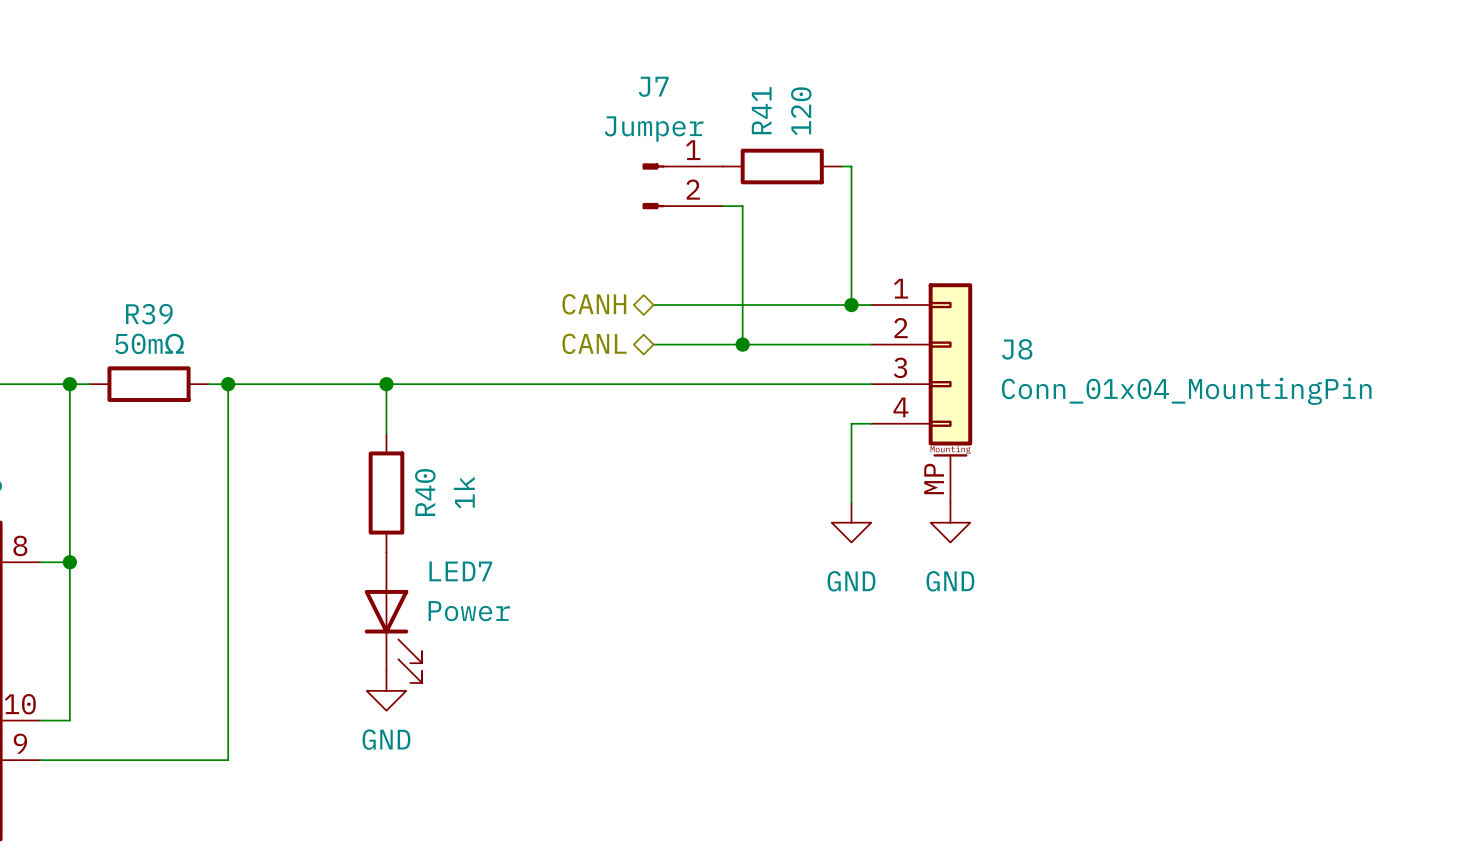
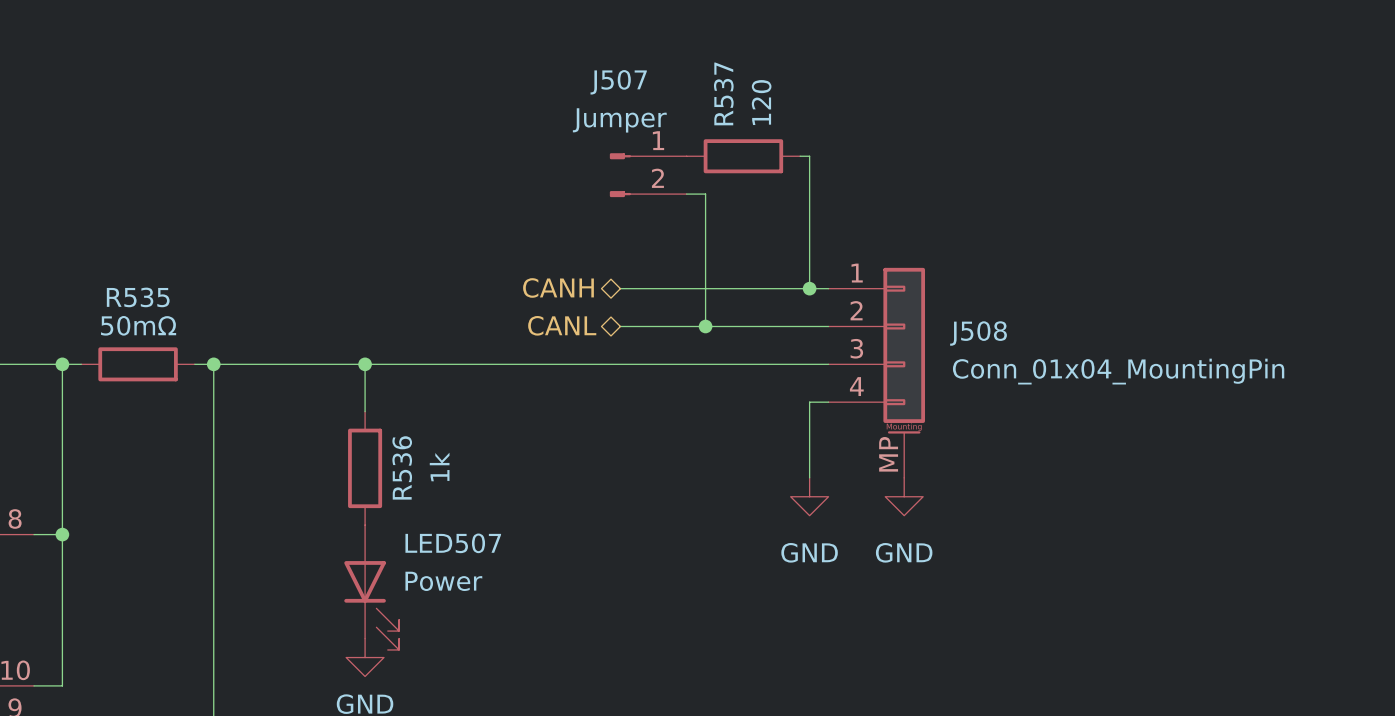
J7 name: J7 (653, 86) -> J507 (618, 82)
R41 name: R41 (761, 110) -> R537 (723, 93)
R39 name: R39 (149, 314) -> R535 (138, 297)
J8 name: J8 (1017, 349) -> J508 (978, 333)
R40 name: R40 (425, 492) -> R536 (402, 467)
LED7 name: LED7 (460, 571) -> LED507 (453, 543)

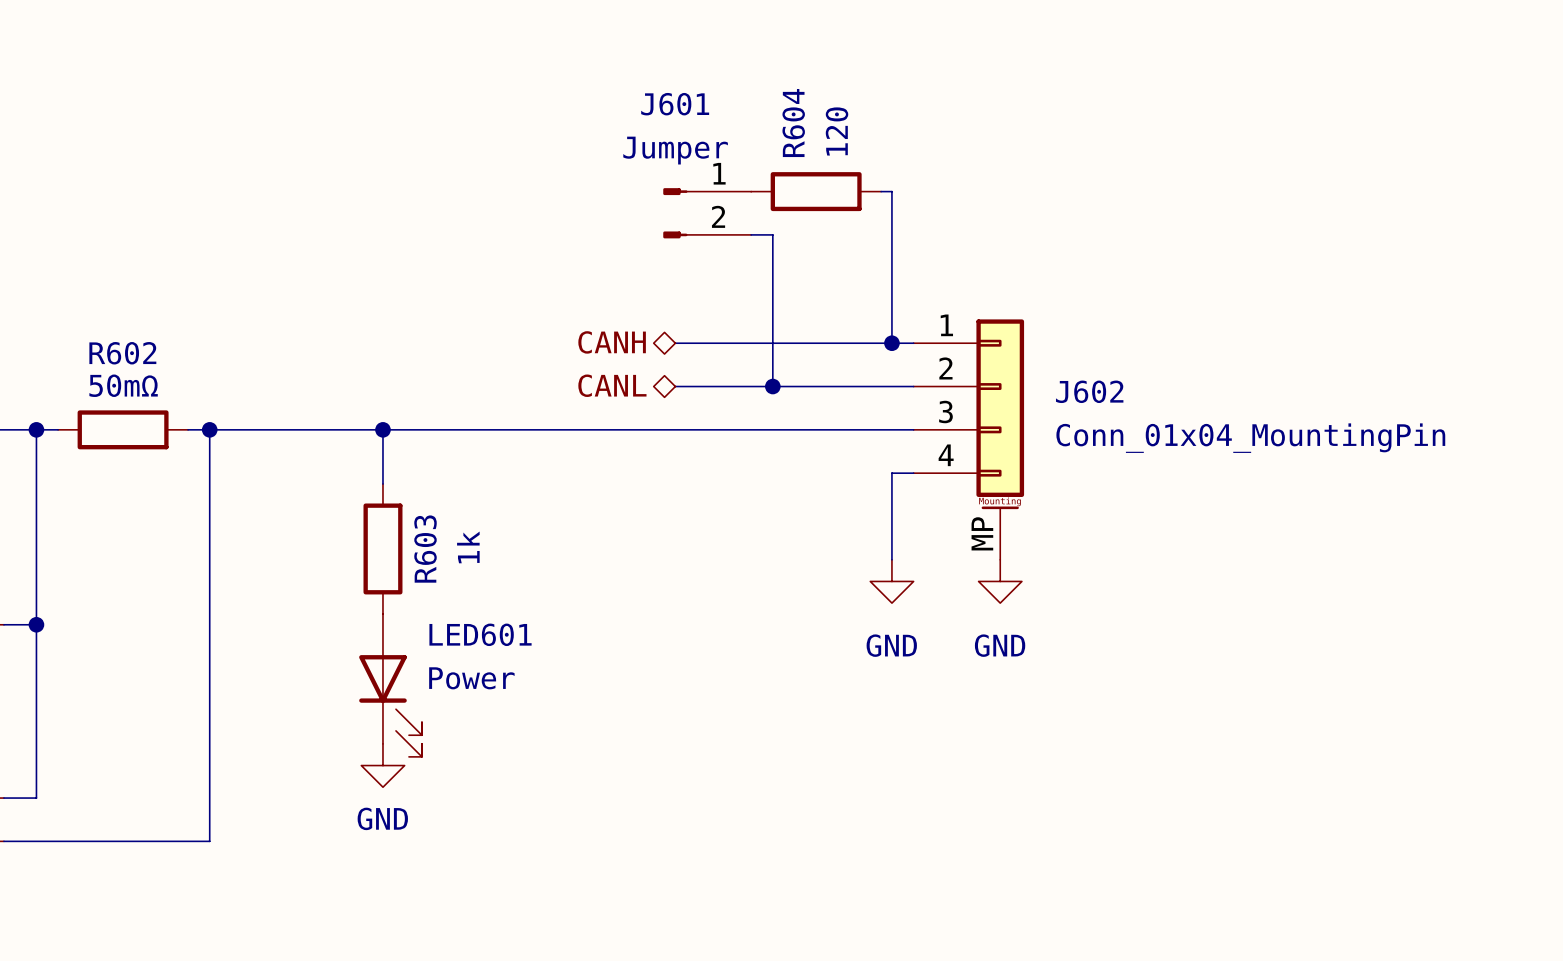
J507 name: J507 (618, 82) -> J601 (675, 104)
R537 name: R537 (723, 93) -> R604 (793, 123)
R535 name: R535 (138, 297) -> R602 (122, 353)
J508 name: J508 (978, 333) -> J602 (1089, 391)
R536 name: R536 (402, 467) -> R603 (425, 549)
LED507 name: LED507 (453, 543) -> LED601 (480, 634)

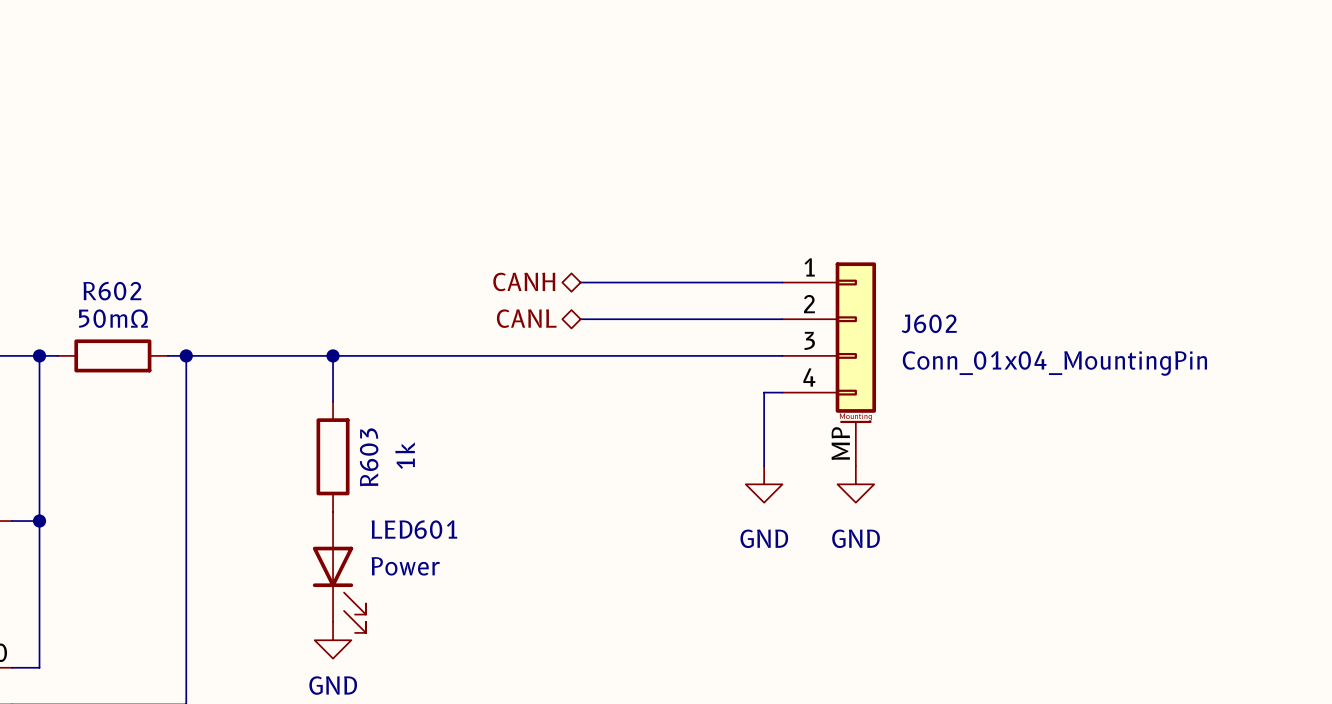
R604: 120 (816, 191) -> none
wire: (881, 191) (891, 191) (891, 343) -> none
J601: Jumper (707, 213) -> none
wire: (751, 234) (772, 234) (772, 386) -> none
junction: (891, 343) -> none
junction: (772, 386) -> none

